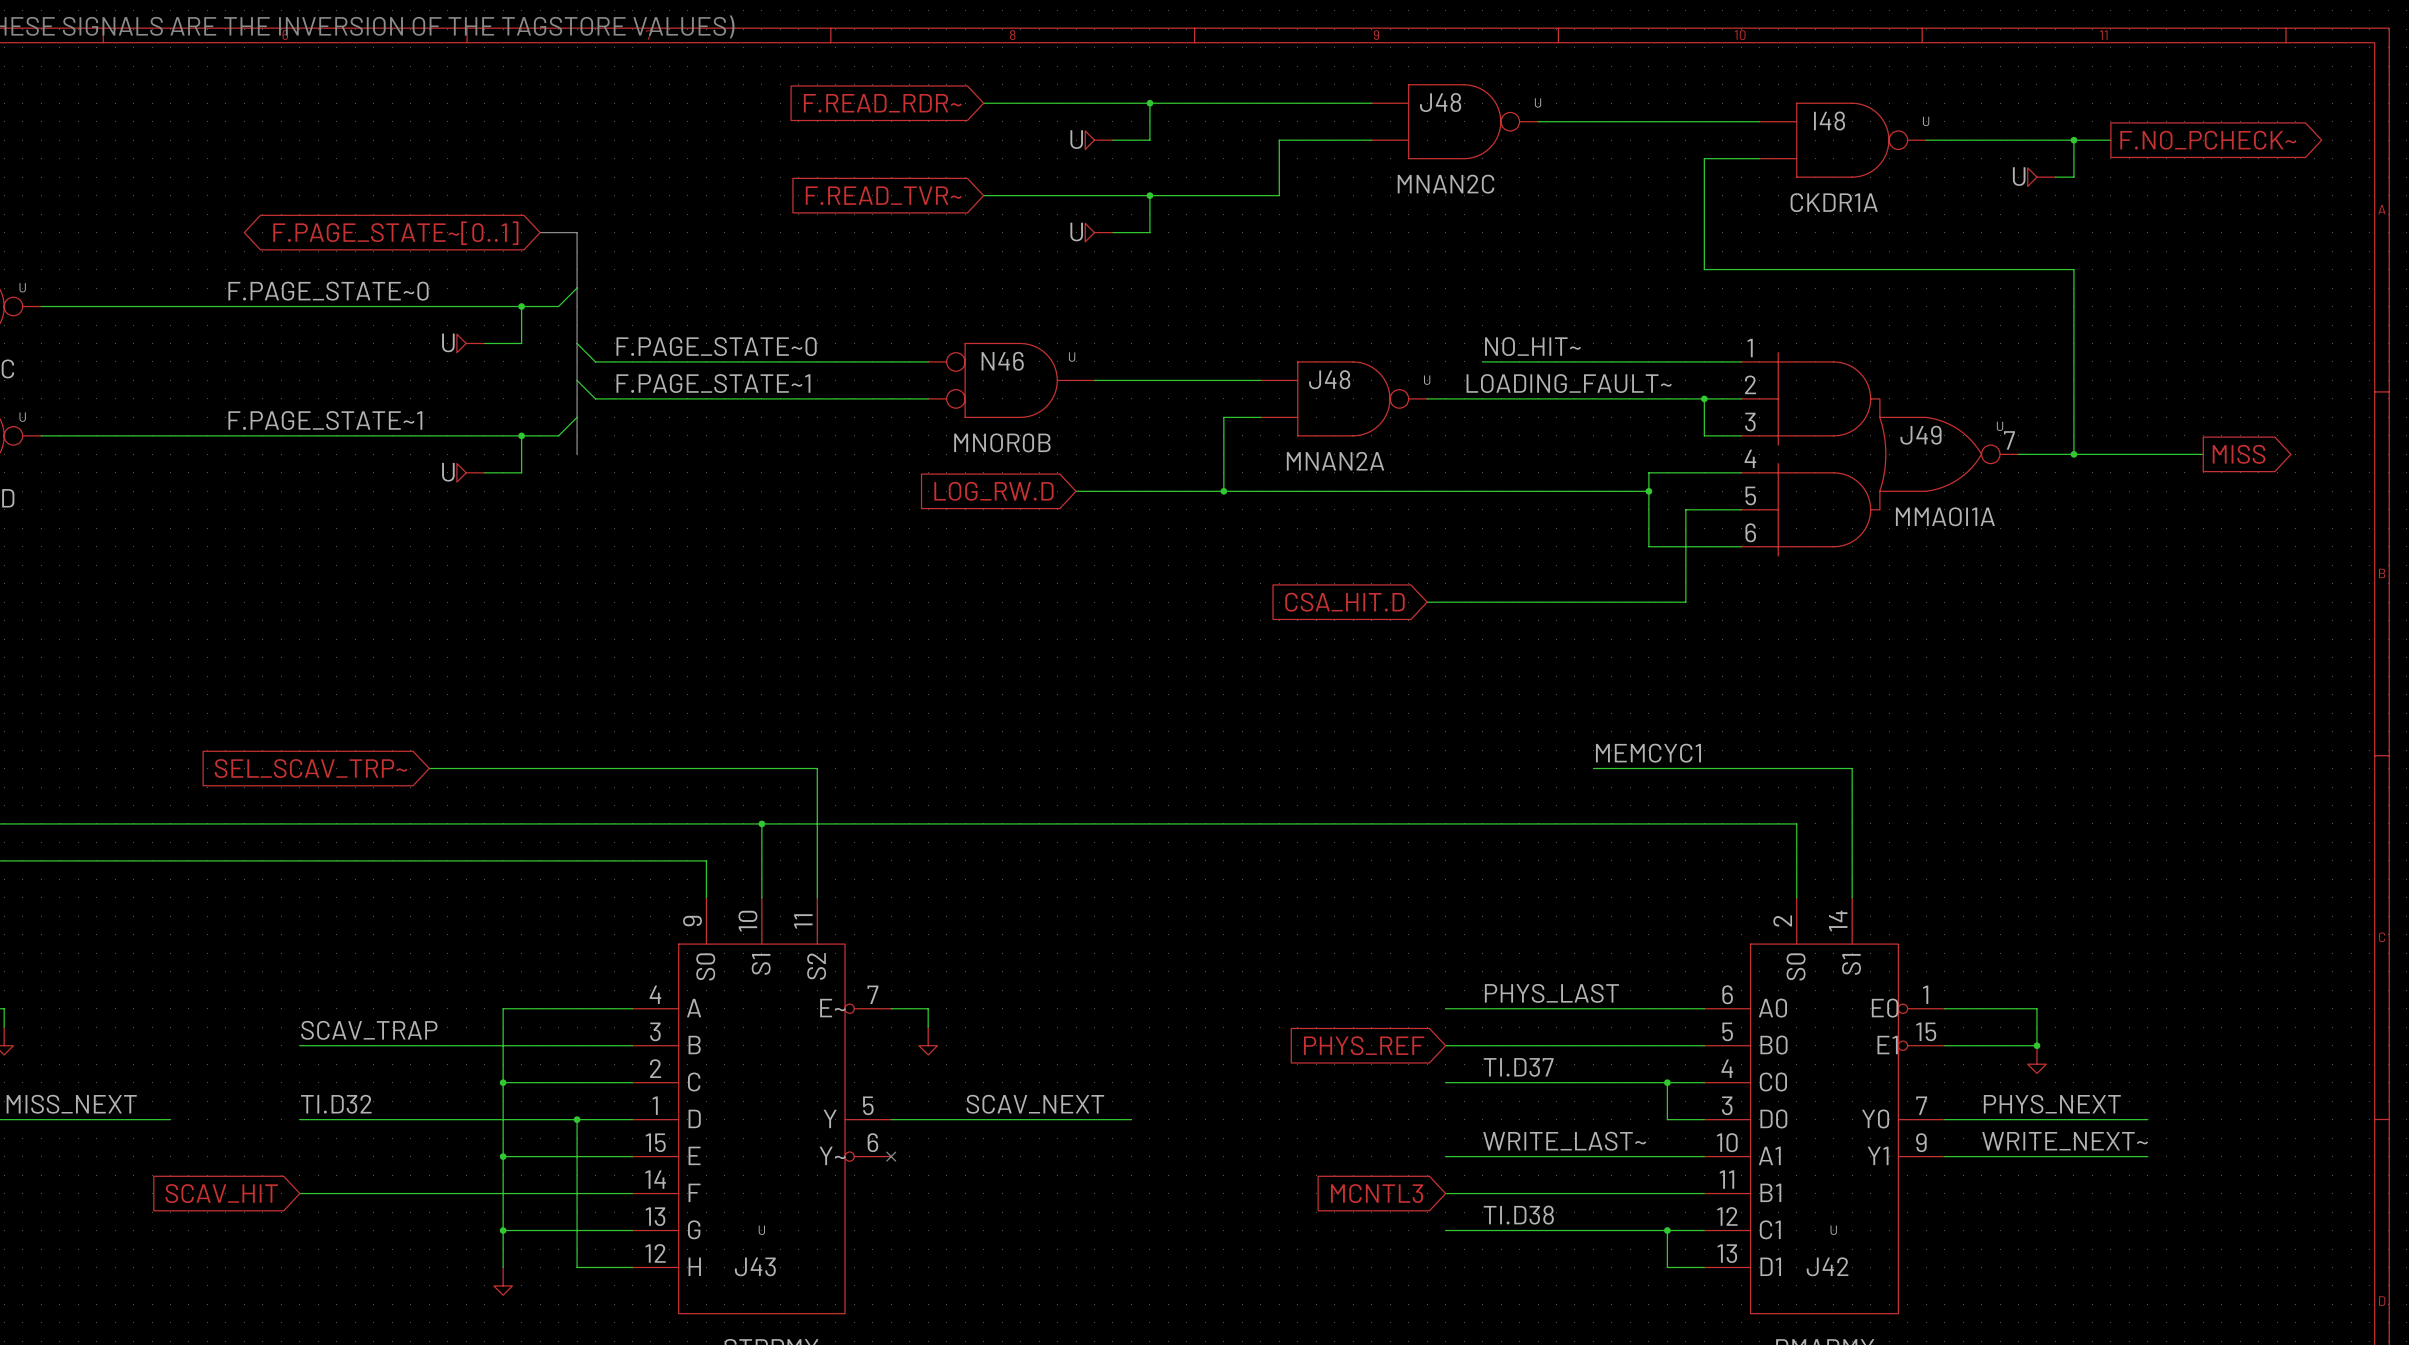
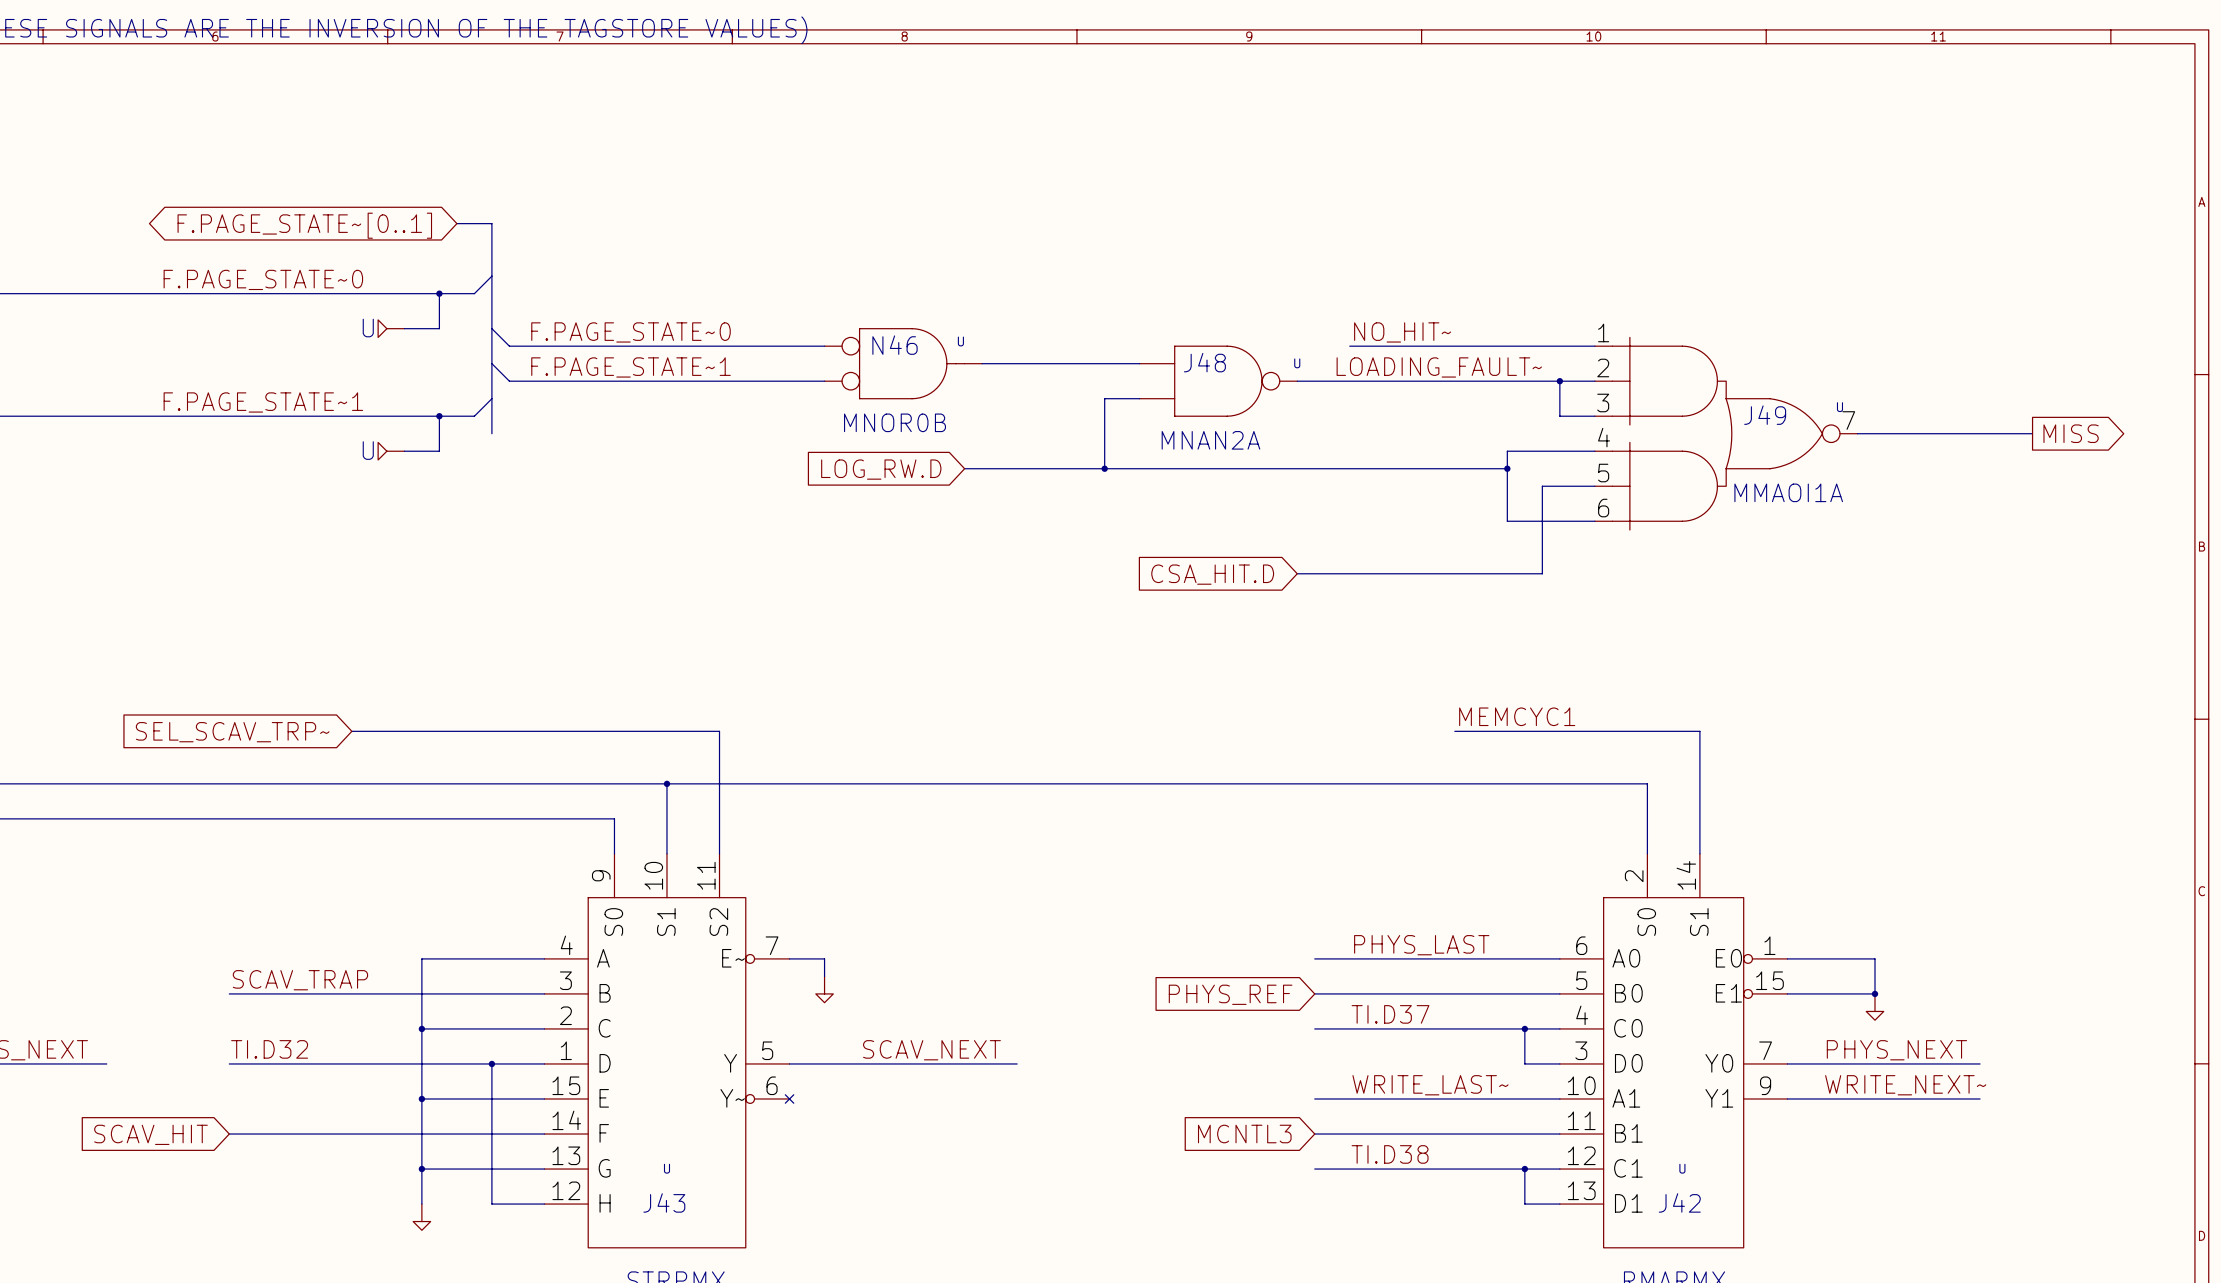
global label: F.READ_RDR~ (882, 103) -> none
wire: (983, 103) (1371, 103) -> none
wire: (1149, 103) (1149, 140) (1112, 140) -> none
junction: (1149, 103) -> none
U: (1454, 121) -> none
wire: (1538, 121) (1759, 121) -> none
U: (1098, 140) -> none
wire: (1371, 140) (1279, 140) (1279, 195) (983, 195) -> none
U: (1842, 140) -> none
wire: (1926, 140) (2110, 140) -> none
wire: (2073, 140) (2073, 177) (2055, 177) -> none
junction: (2073, 140) -> none
global label: F.NO_PCHECK~ (2208, 140) -> none
wire: (1759, 158) (1704, 158) (1704, 269) (2073, 269) (2073, 454) -> none
U: (2041, 177) -> none
global label: F.READ_TVR~ (883, 195) -> none
wire: (1149, 195) (1149, 232) (1112, 232) -> none
junction: (1149, 195) -> none
U: (1098, 232) -> none
junction: (2073, 454) -> none

